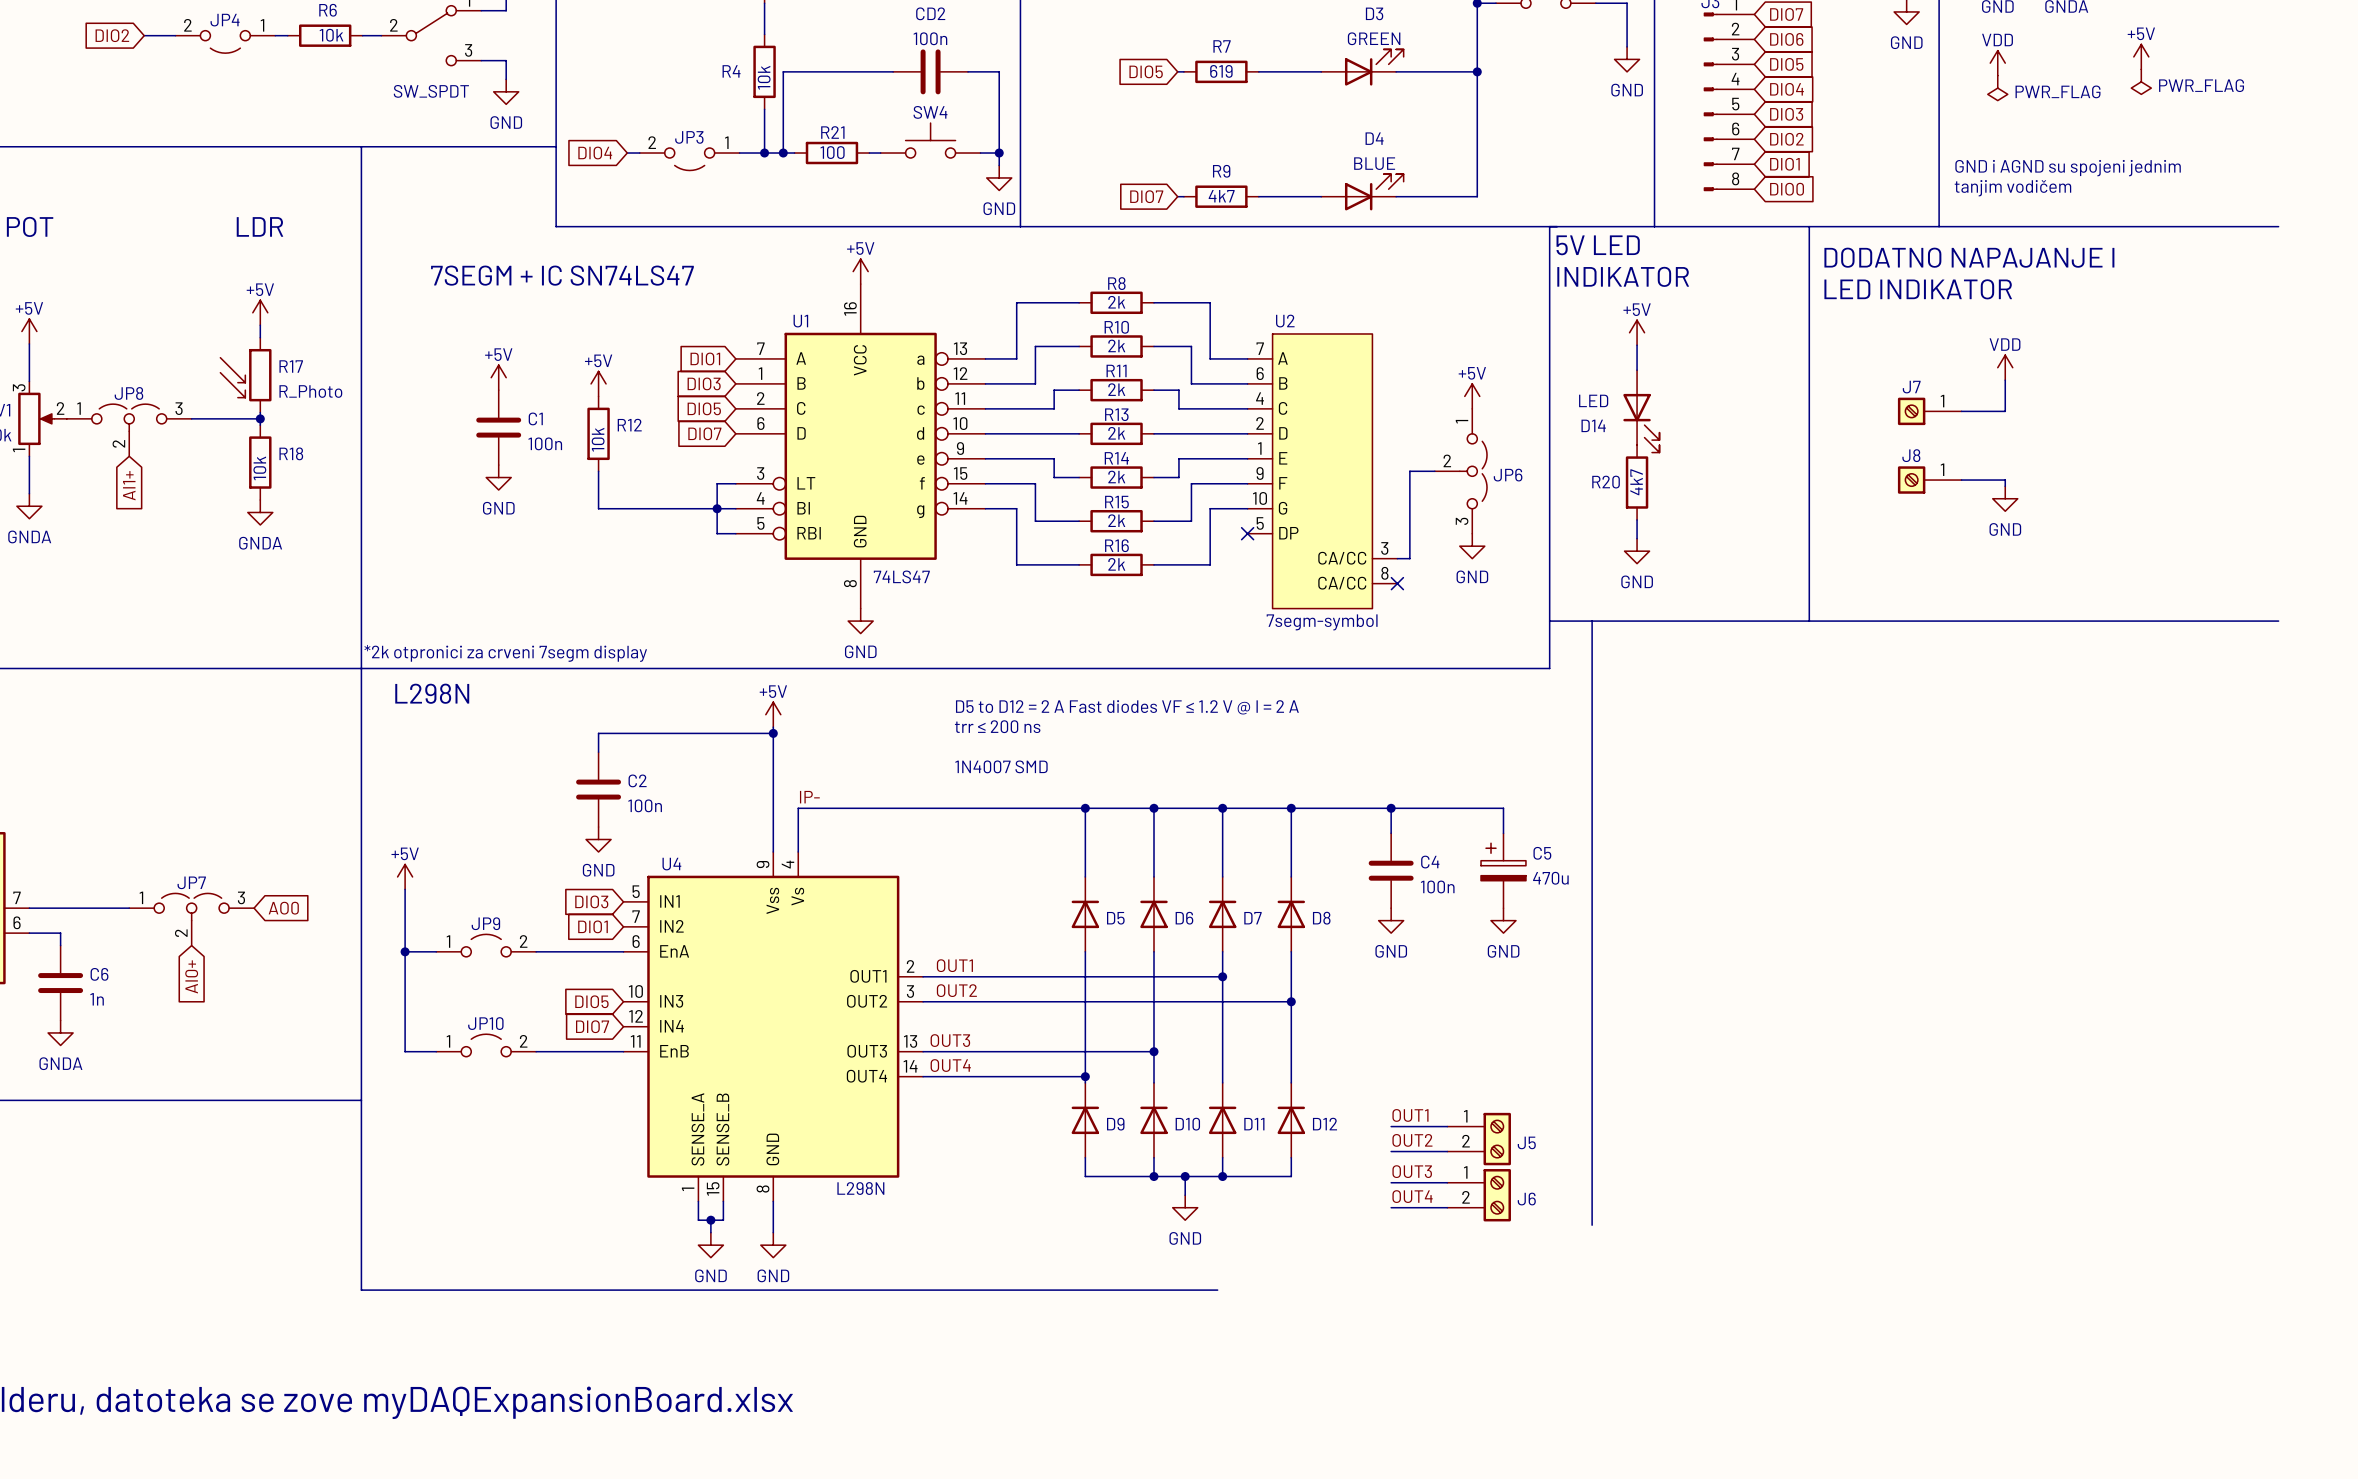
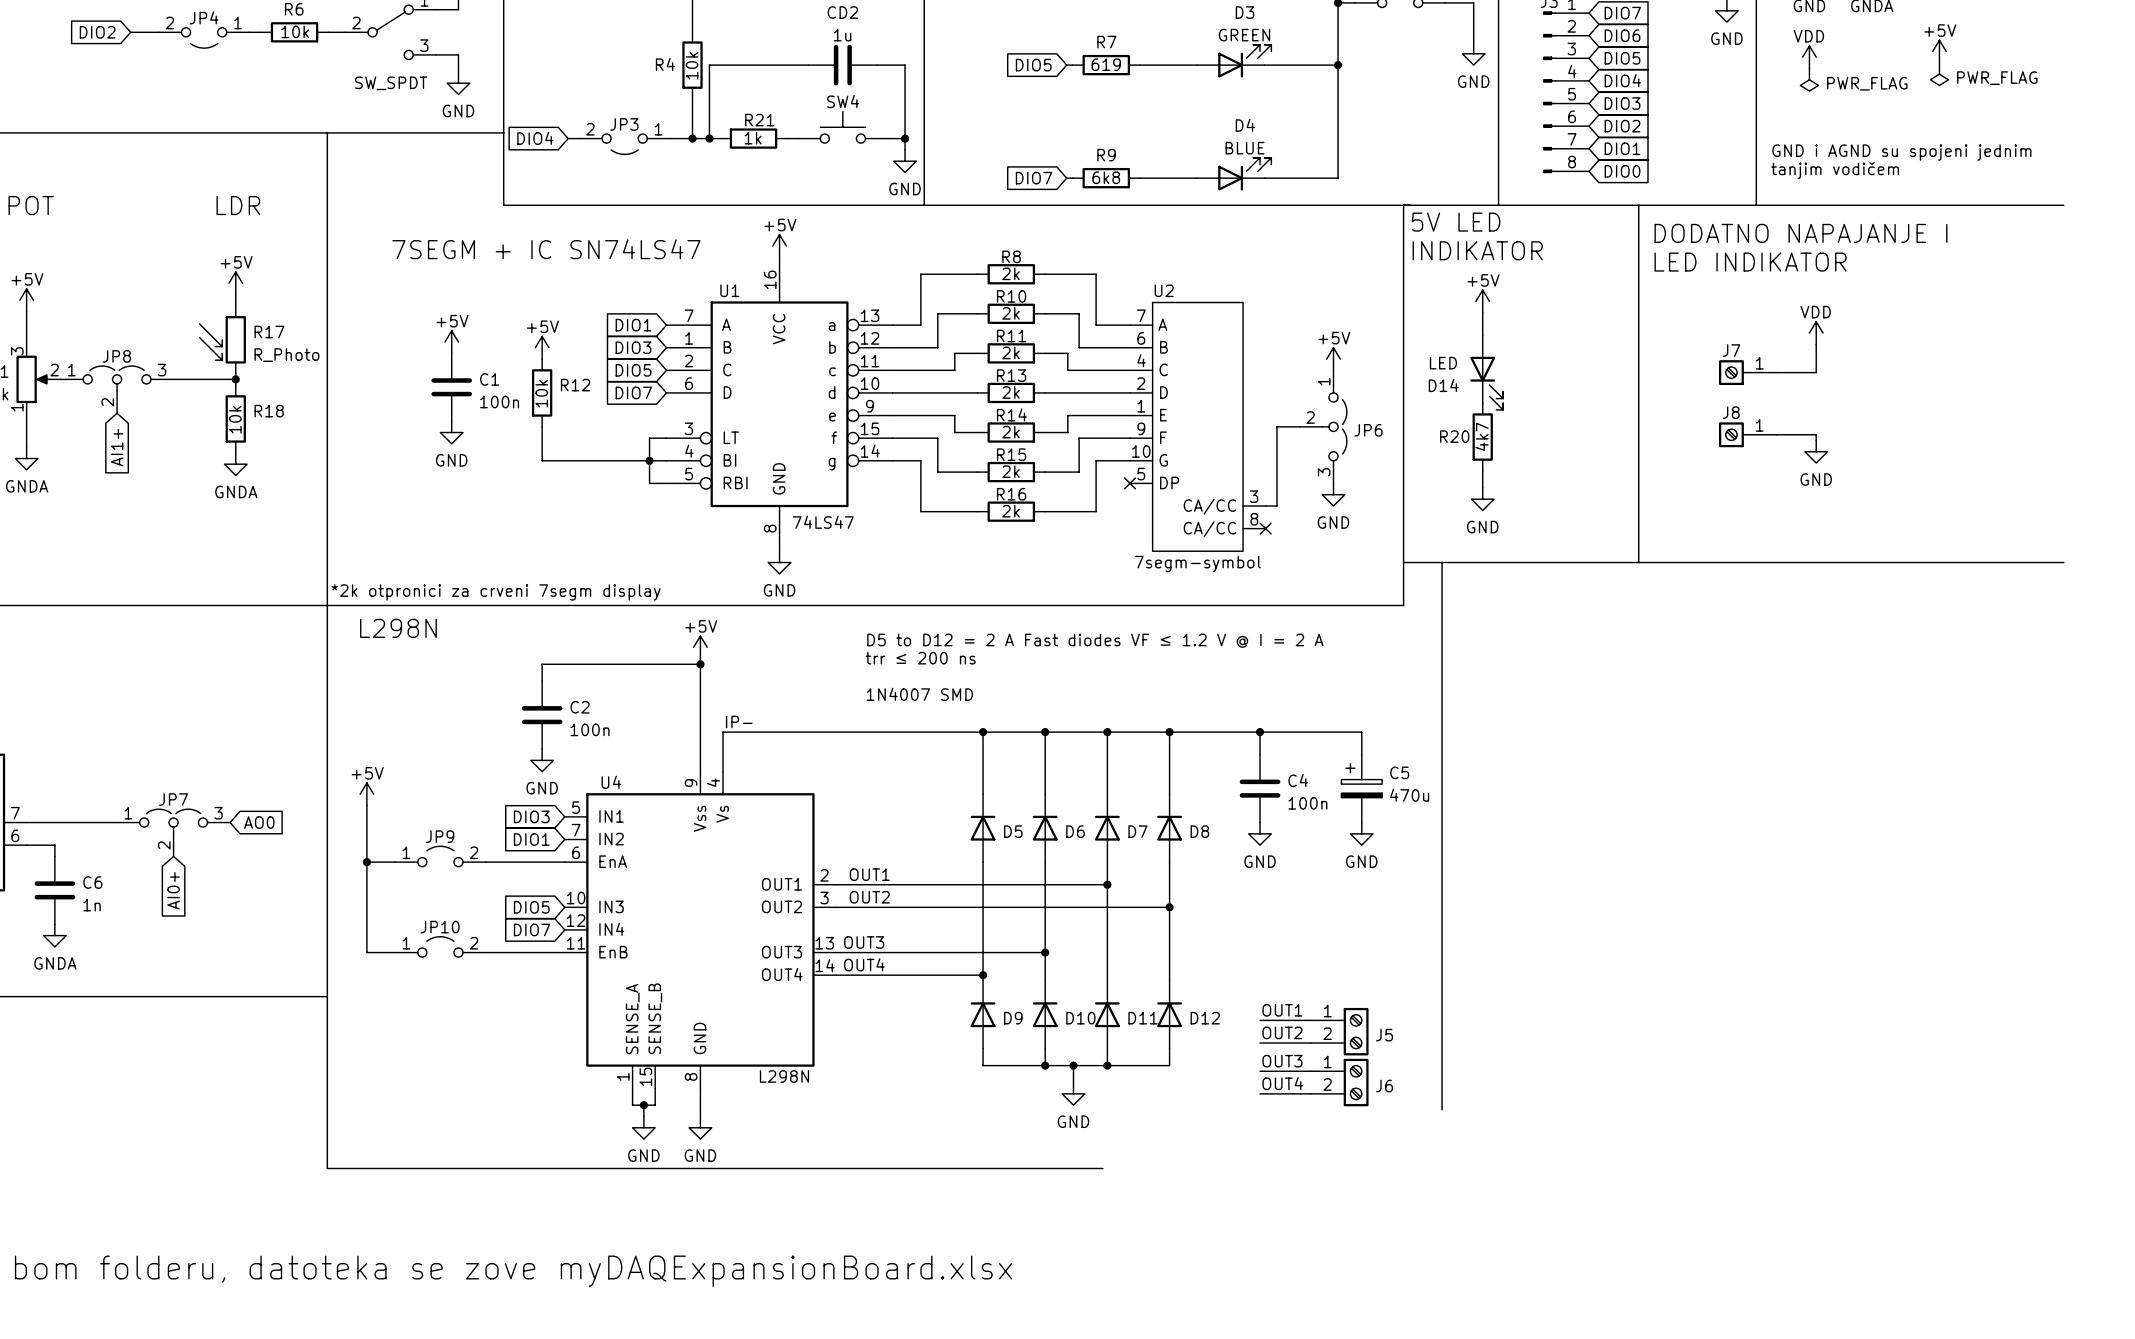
CD2 value: 100n (930, 38) -> 1u (842, 35)
R21 value: 100 (832, 152) -> 1k (753, 138)
R9 value: 4k7 (1221, 196) -> 6k8 (1106, 177)

